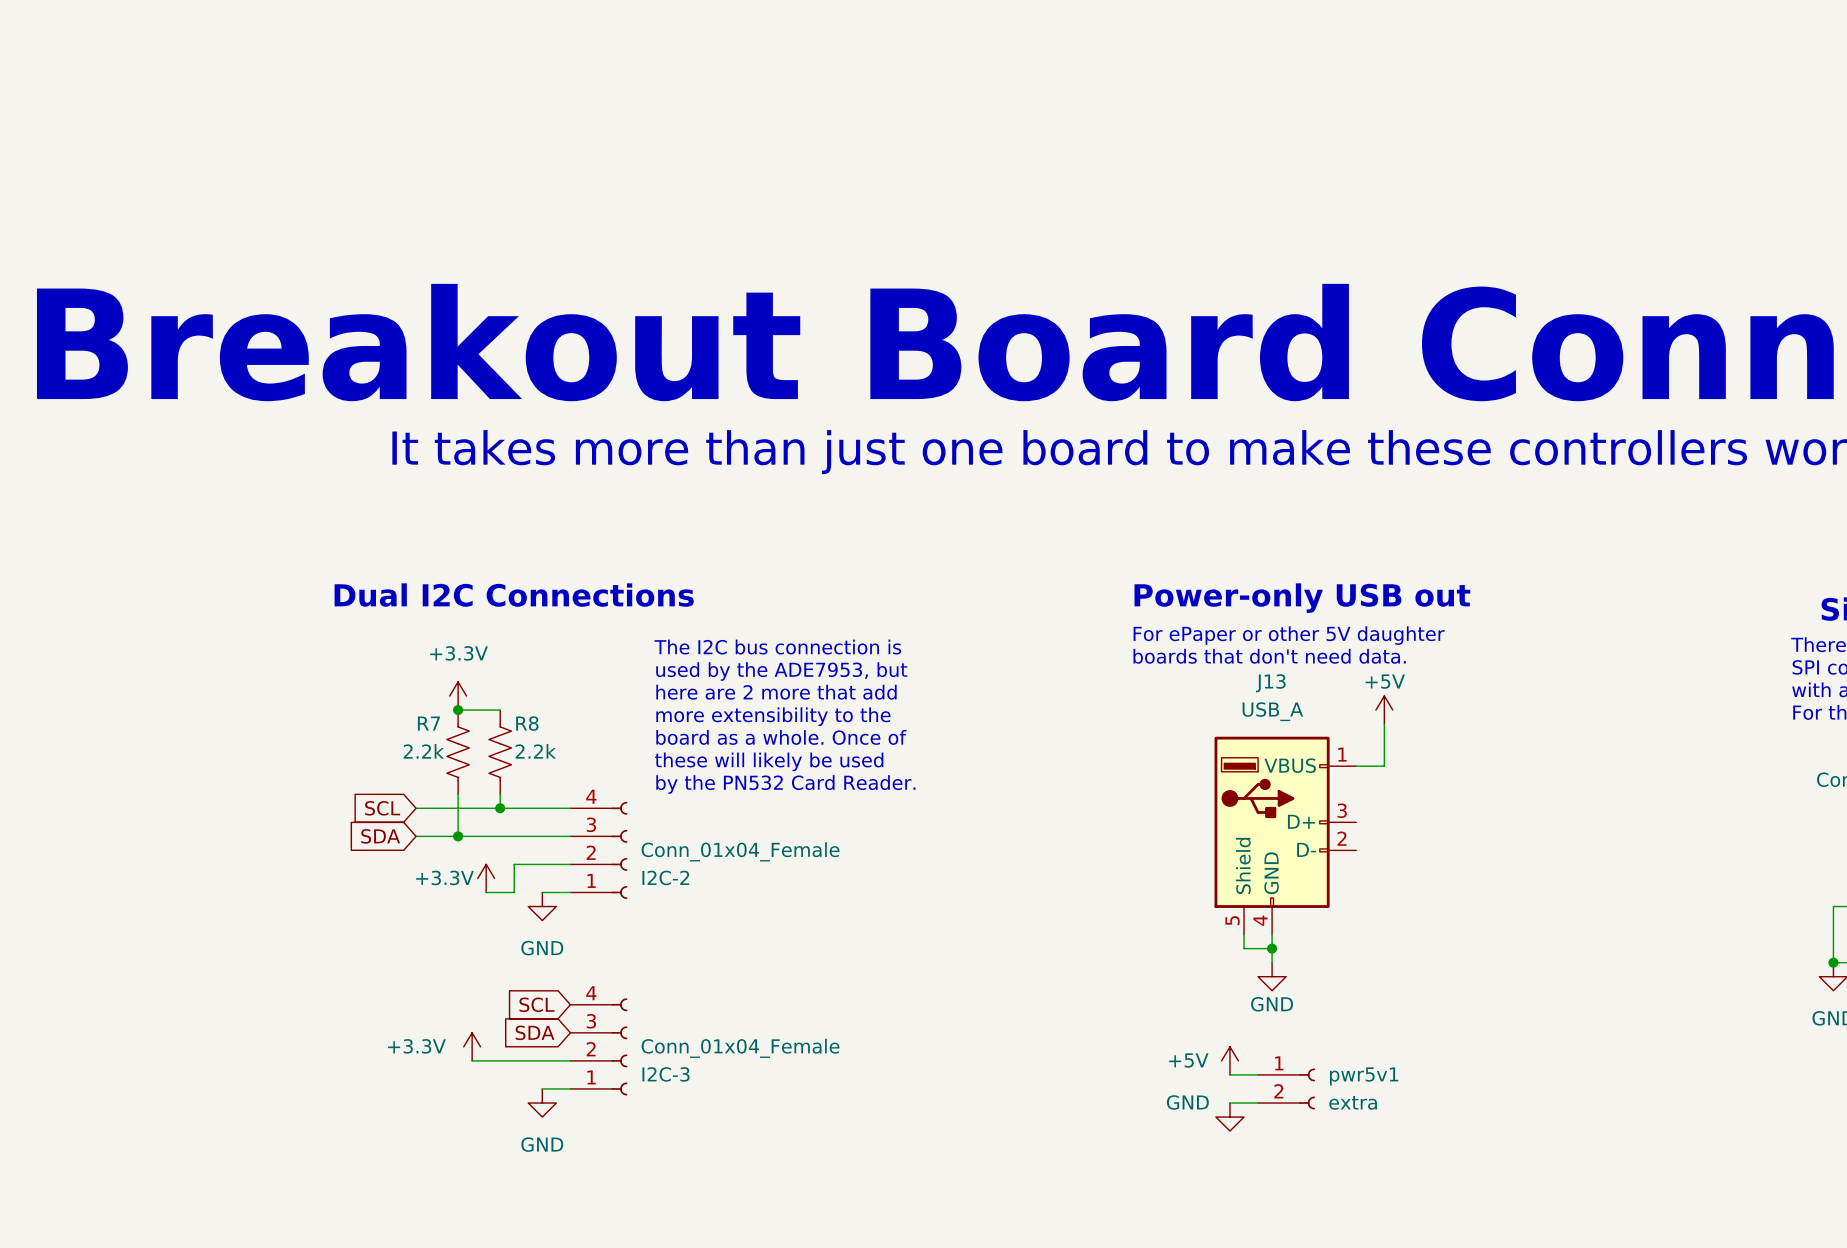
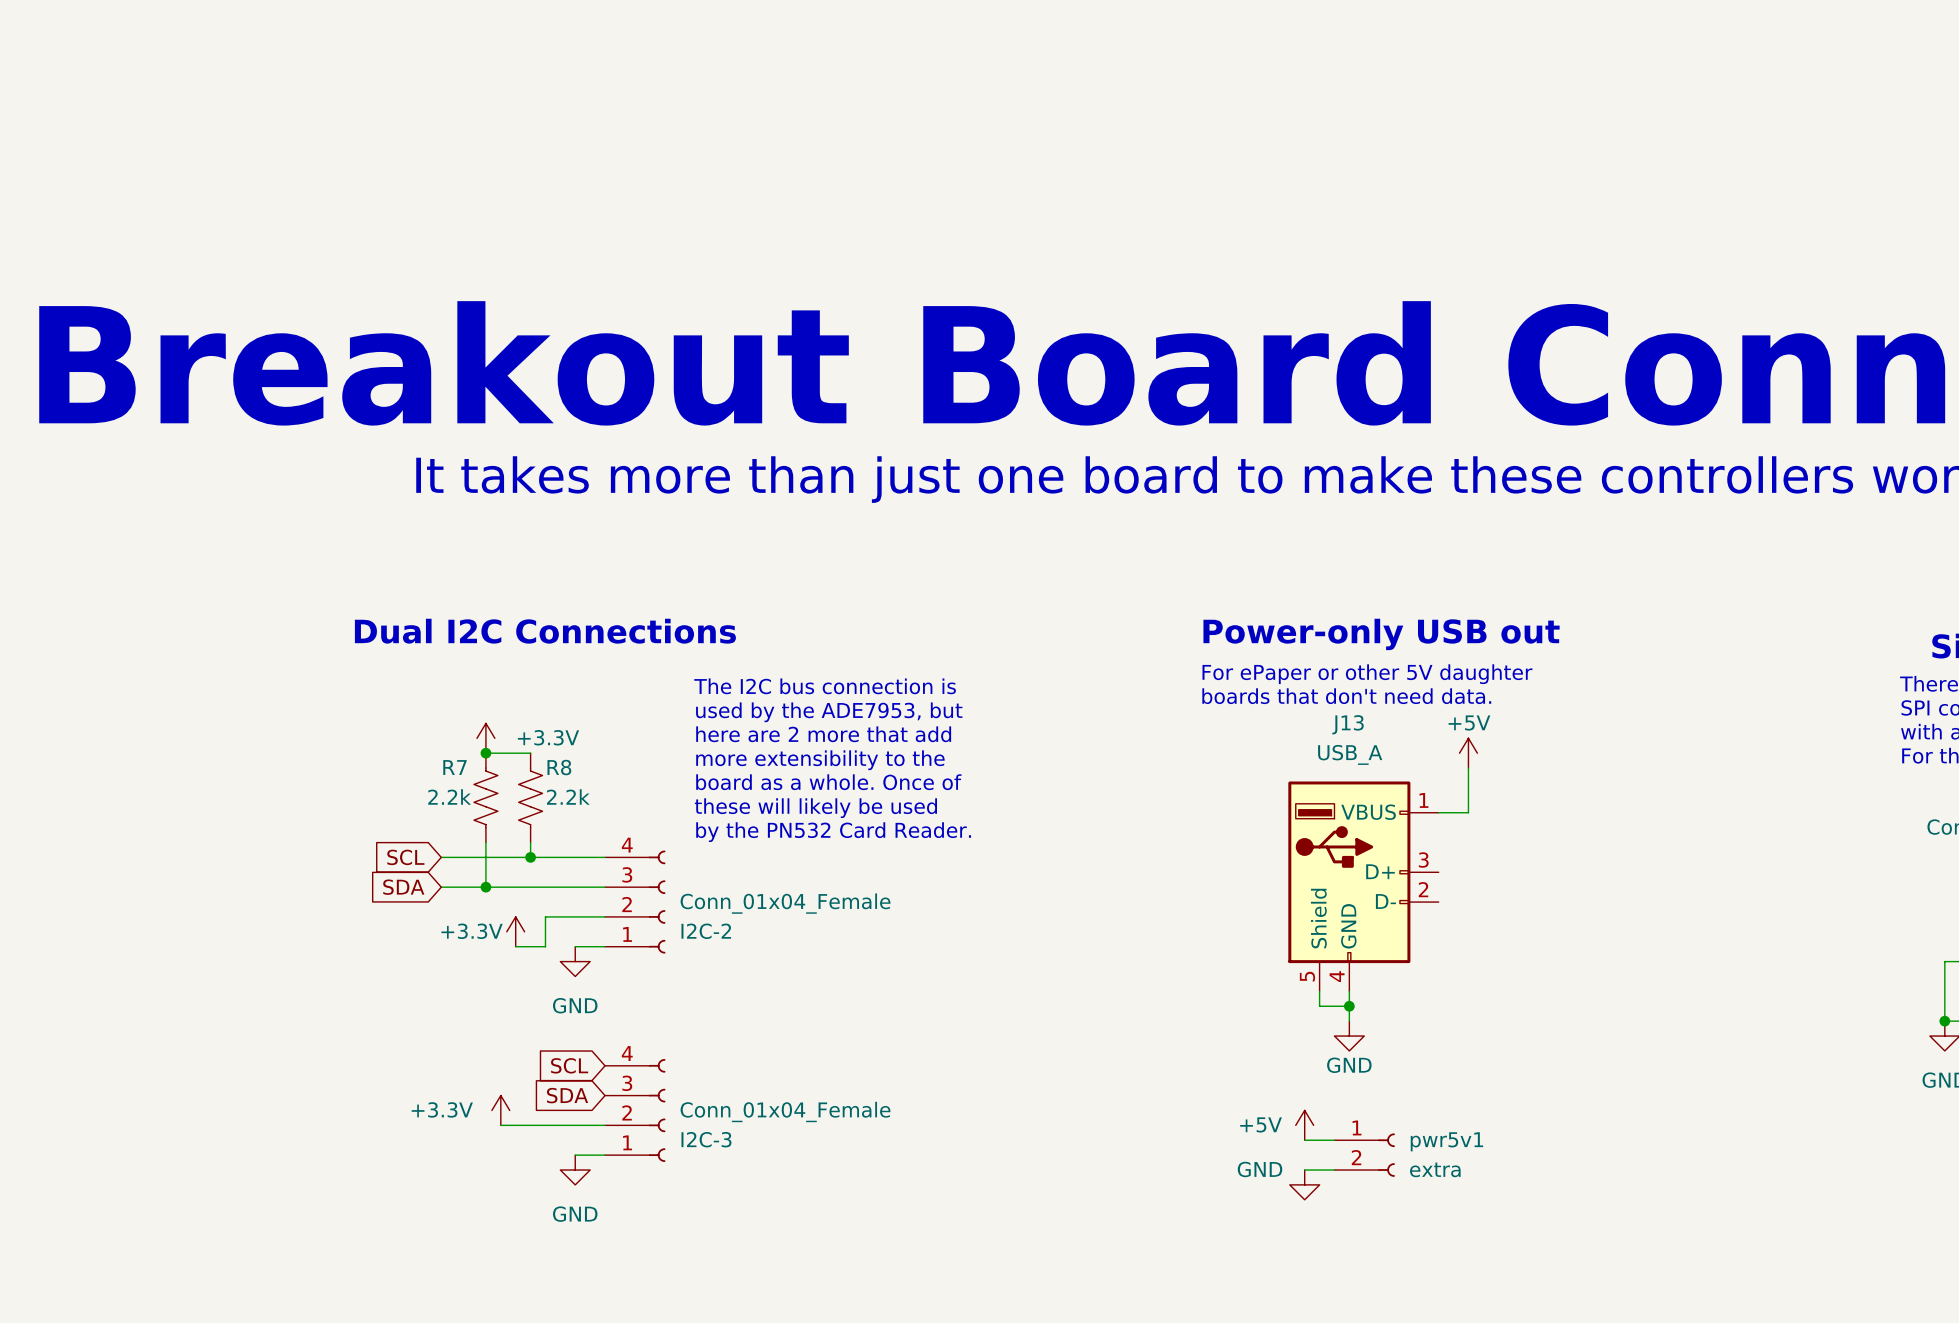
power symbol text position: +3.3V (459, 653) -> +3.3V (548, 737)

